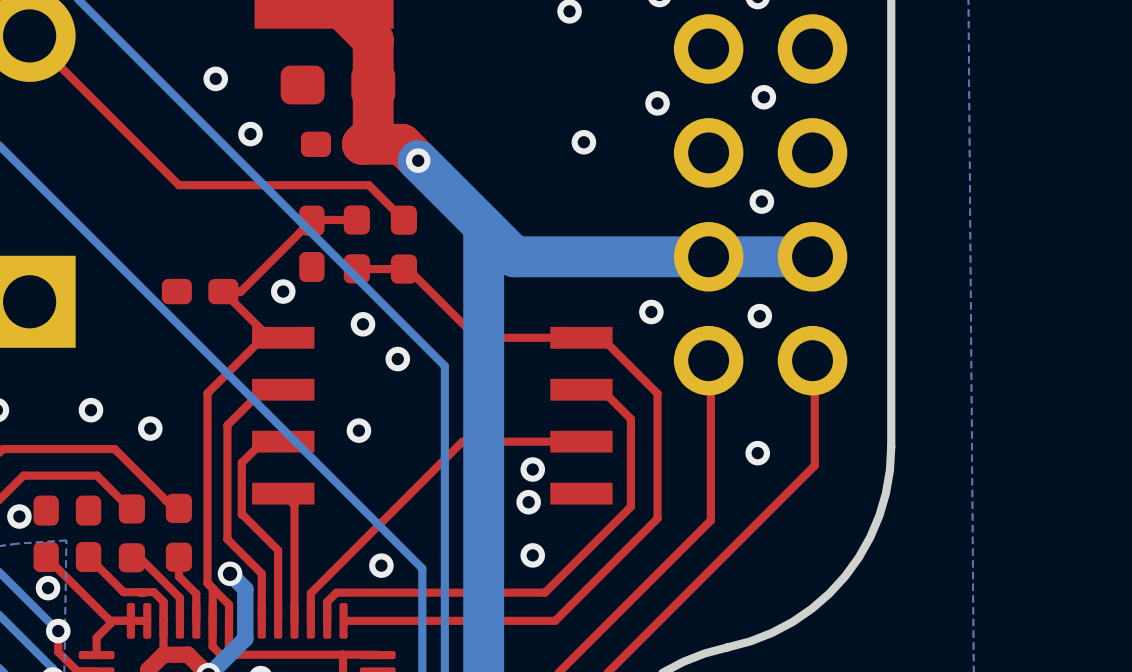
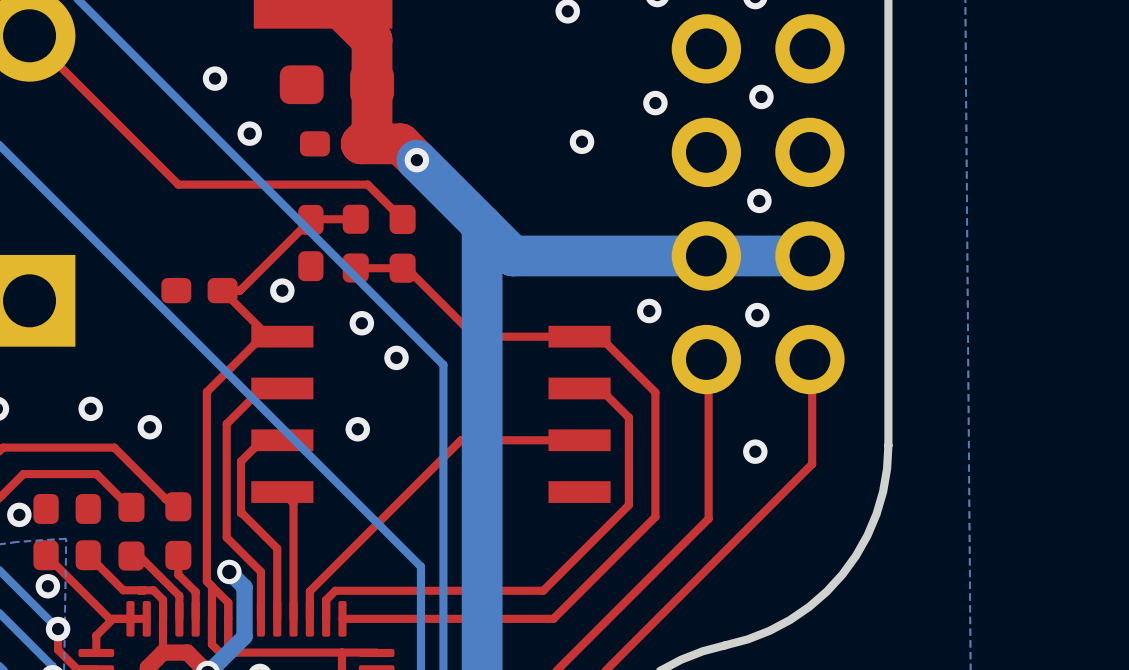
via: (532, 469) -> none
via: (528, 502) -> none
via: (532, 555) -> none
via: (381, 565) -> none

